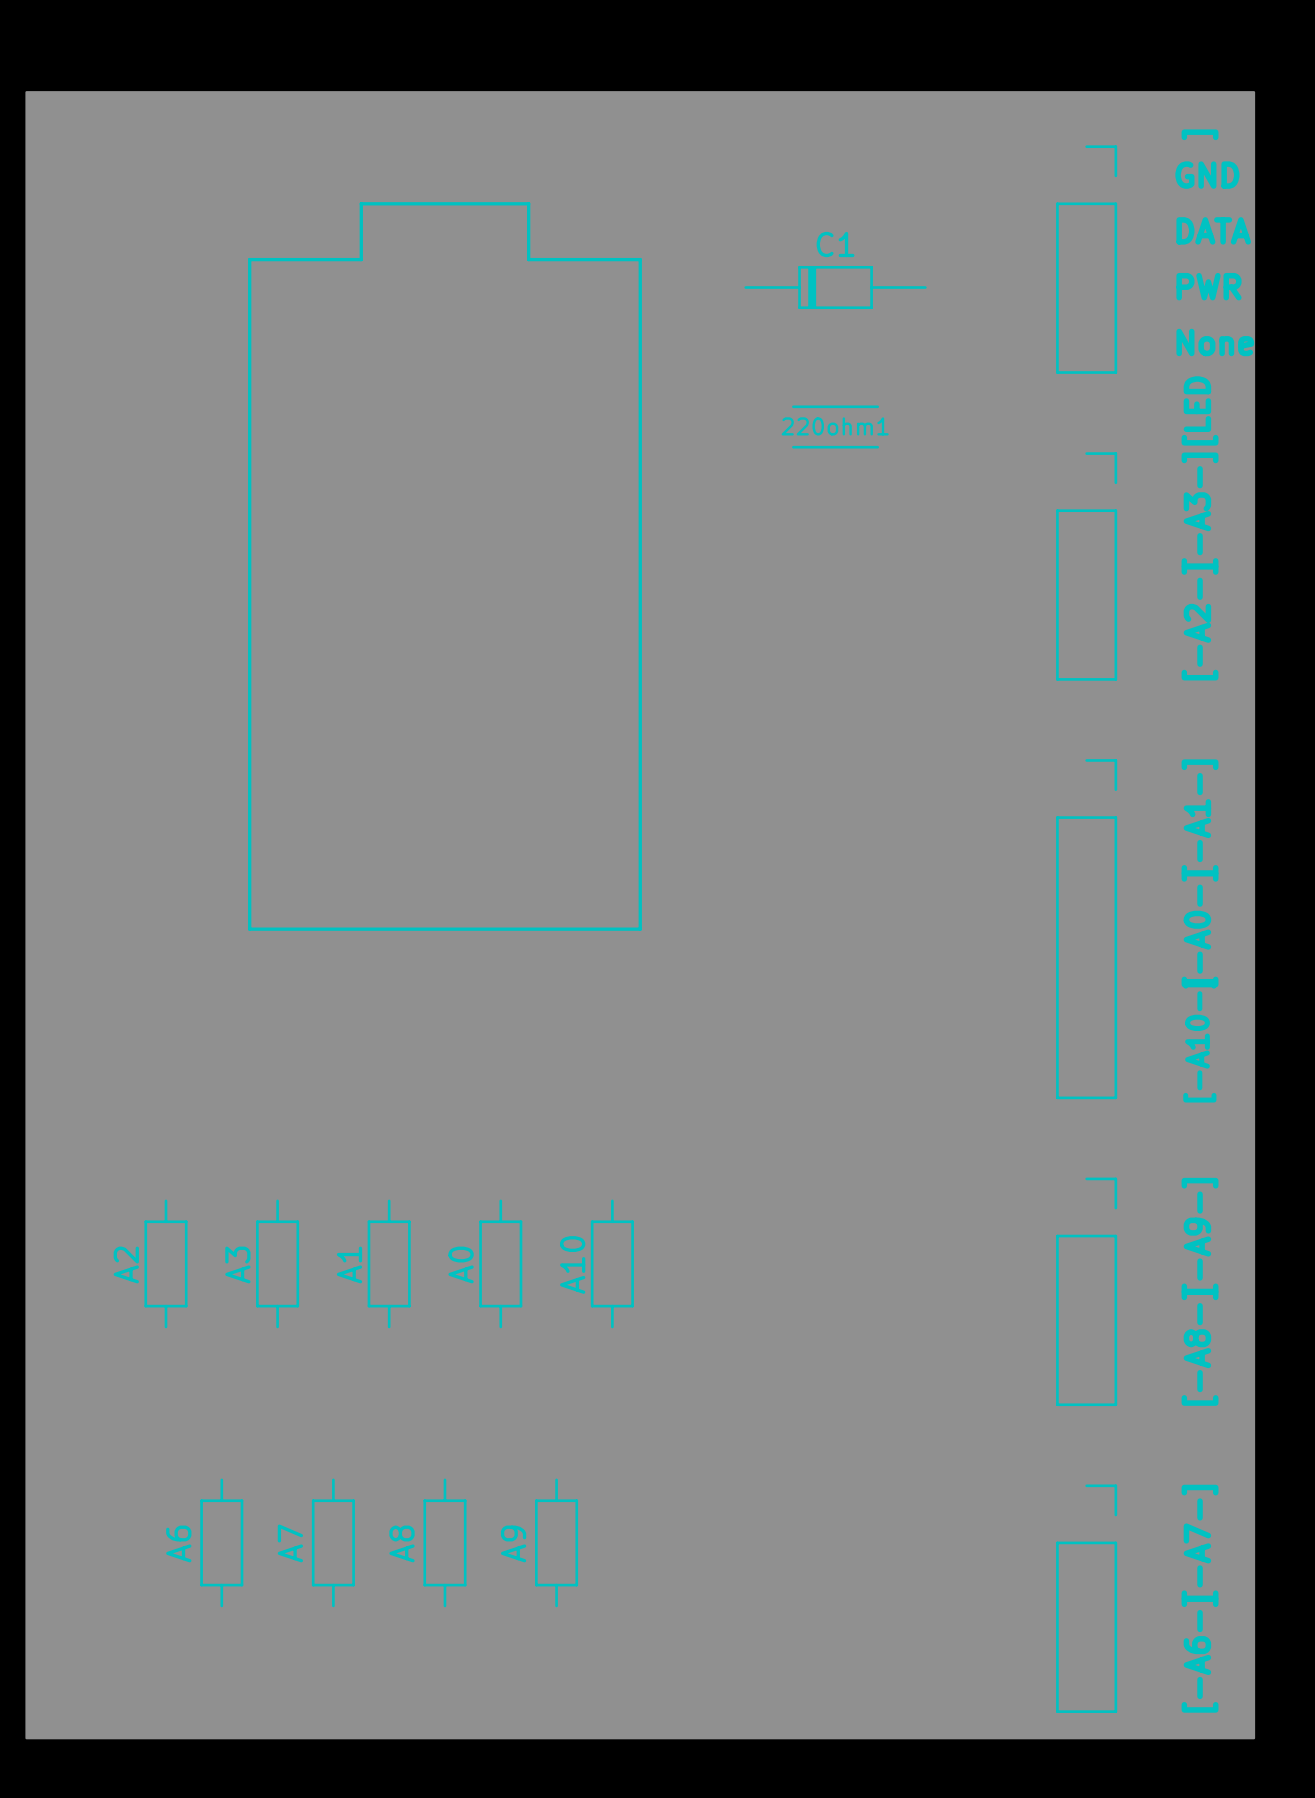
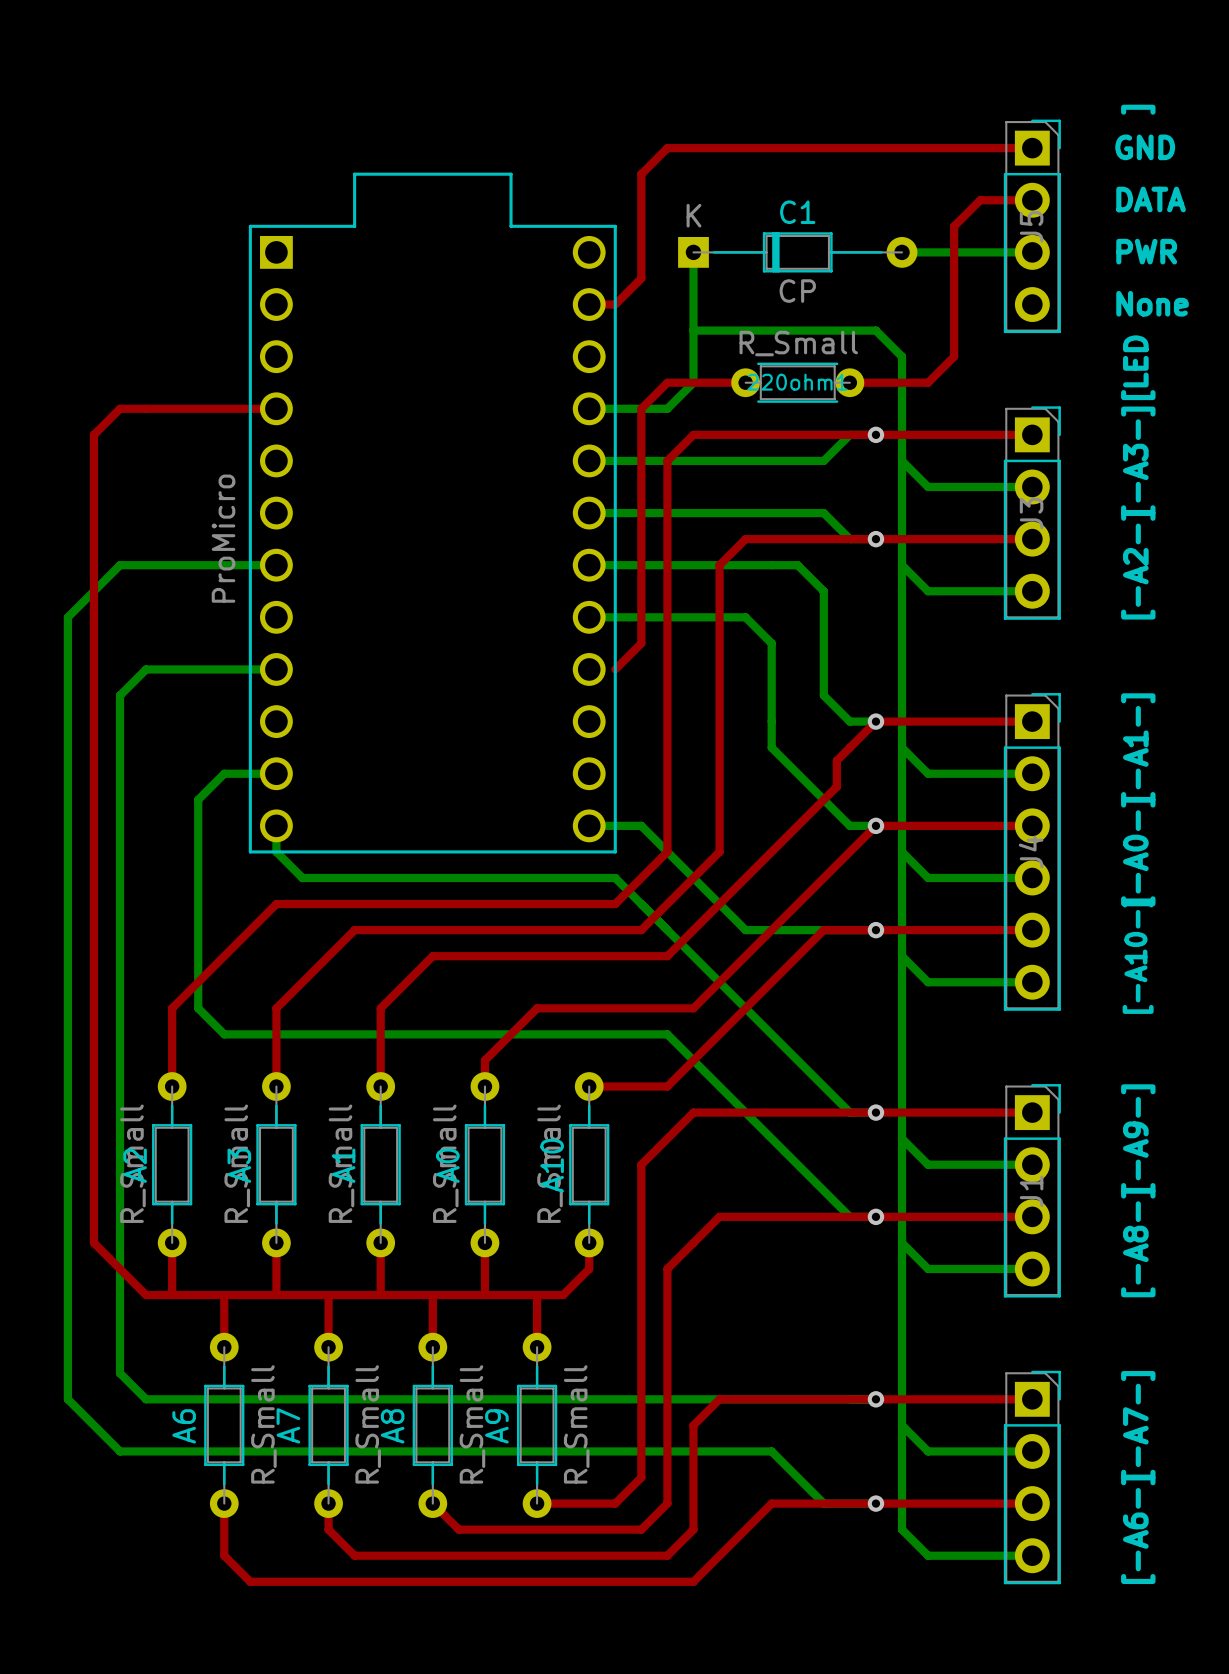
drawing: [25, 91, 1256, 1740] -> none

